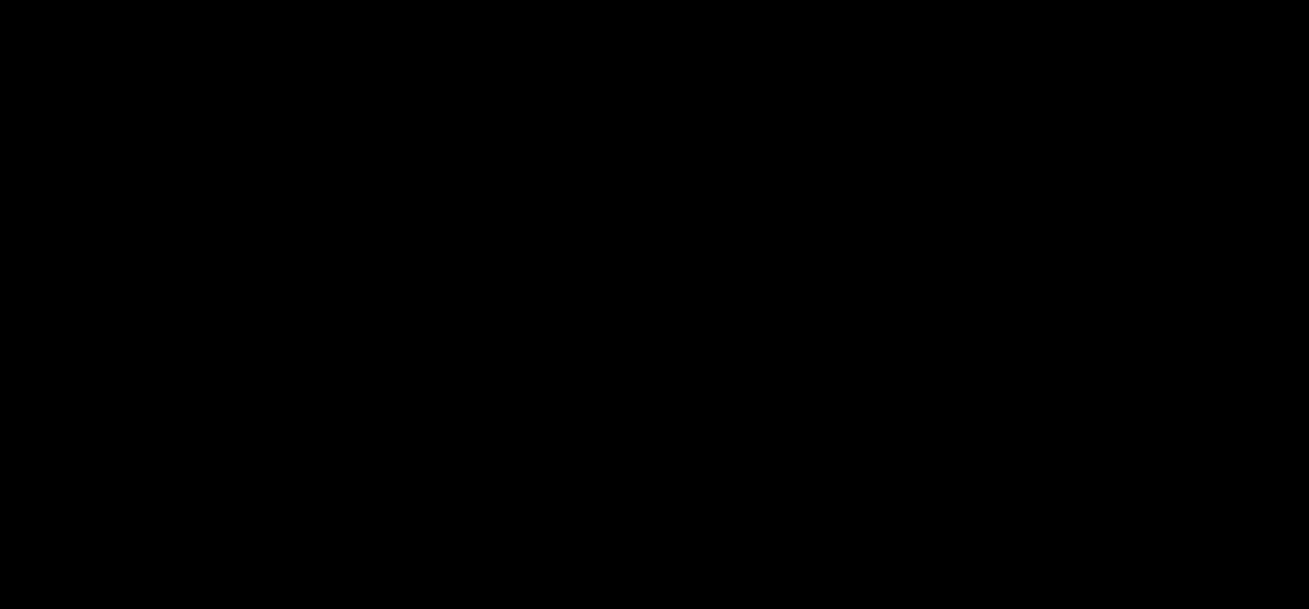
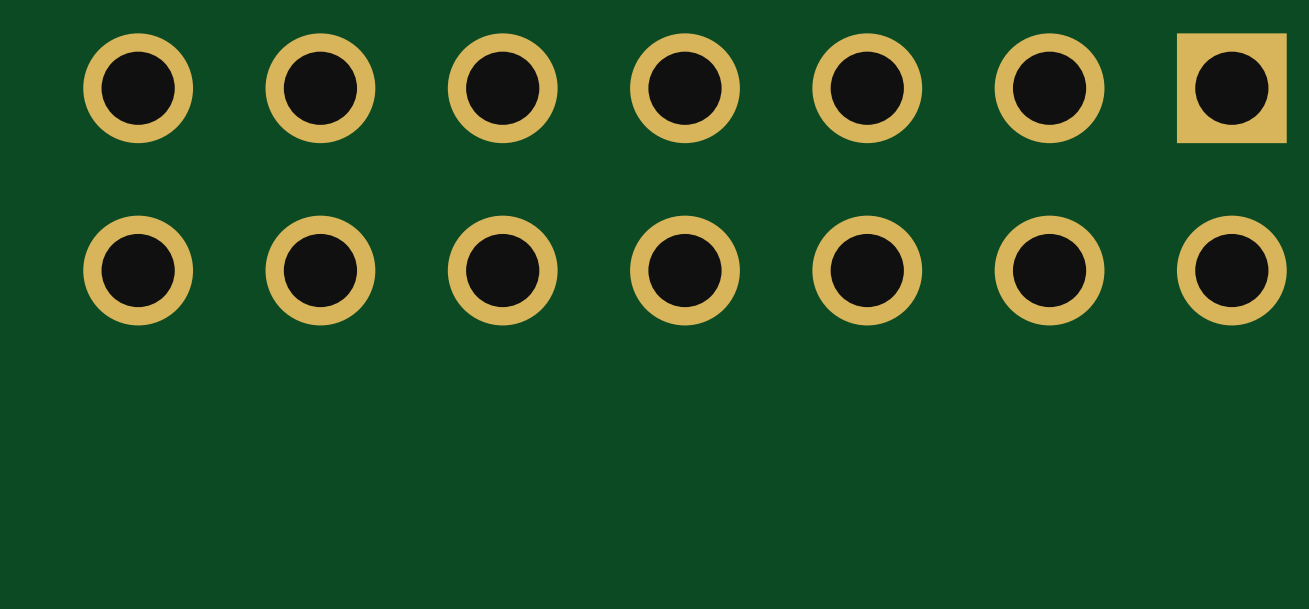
part: none -> (684, 179)

